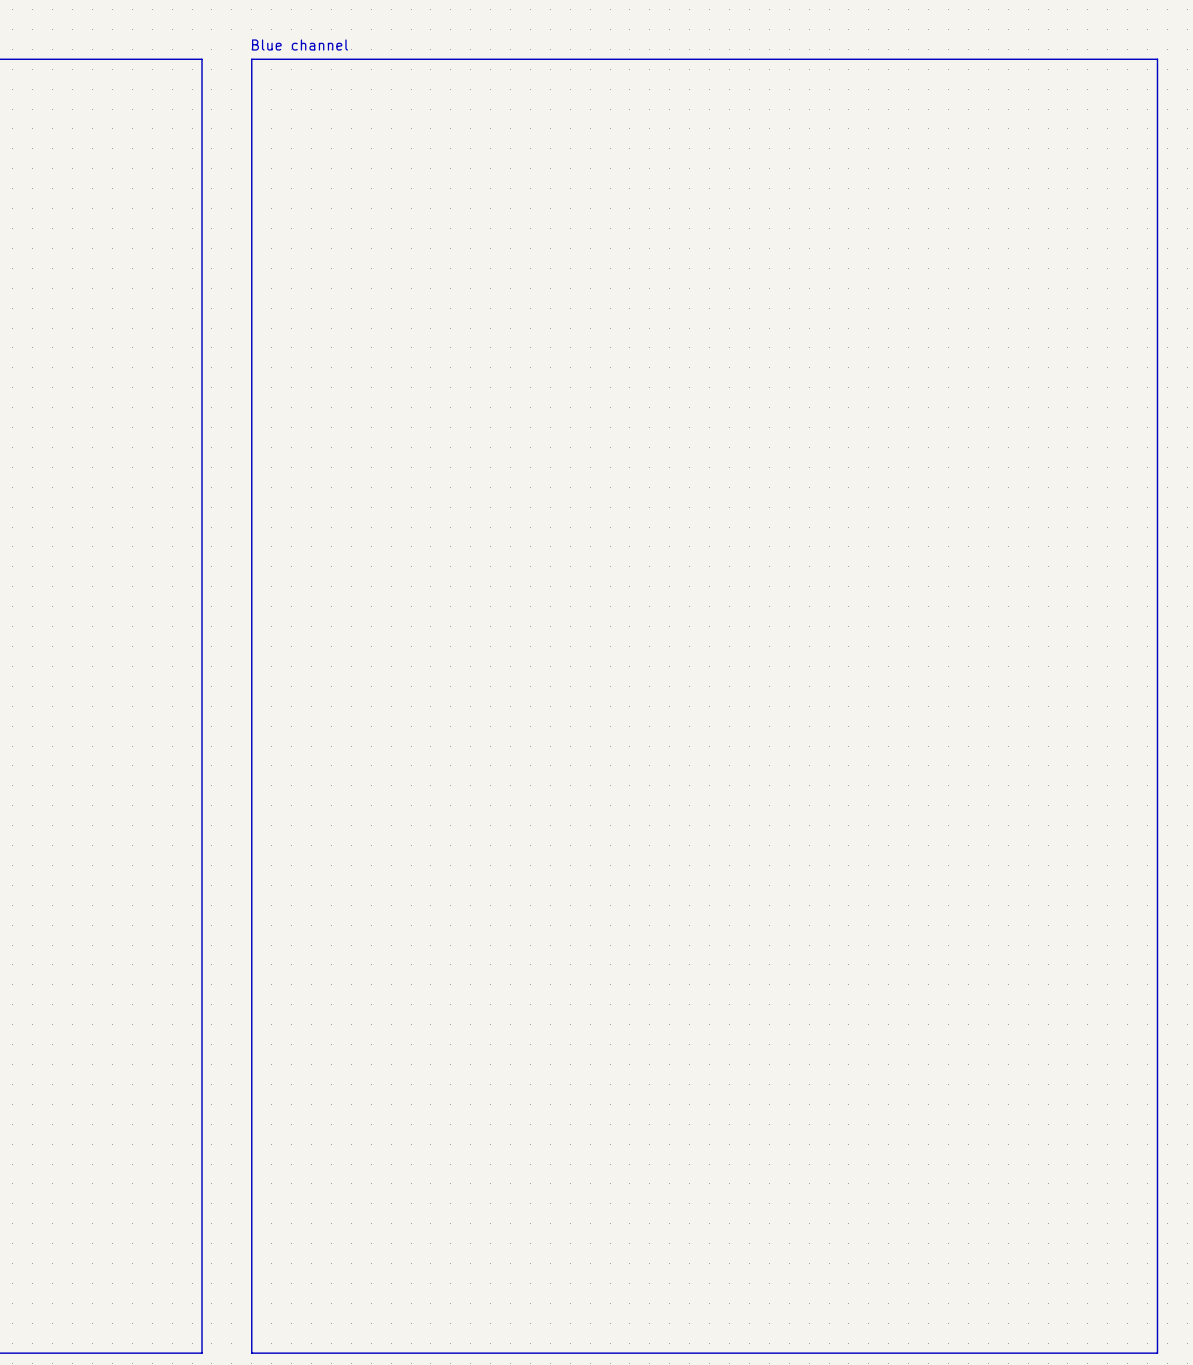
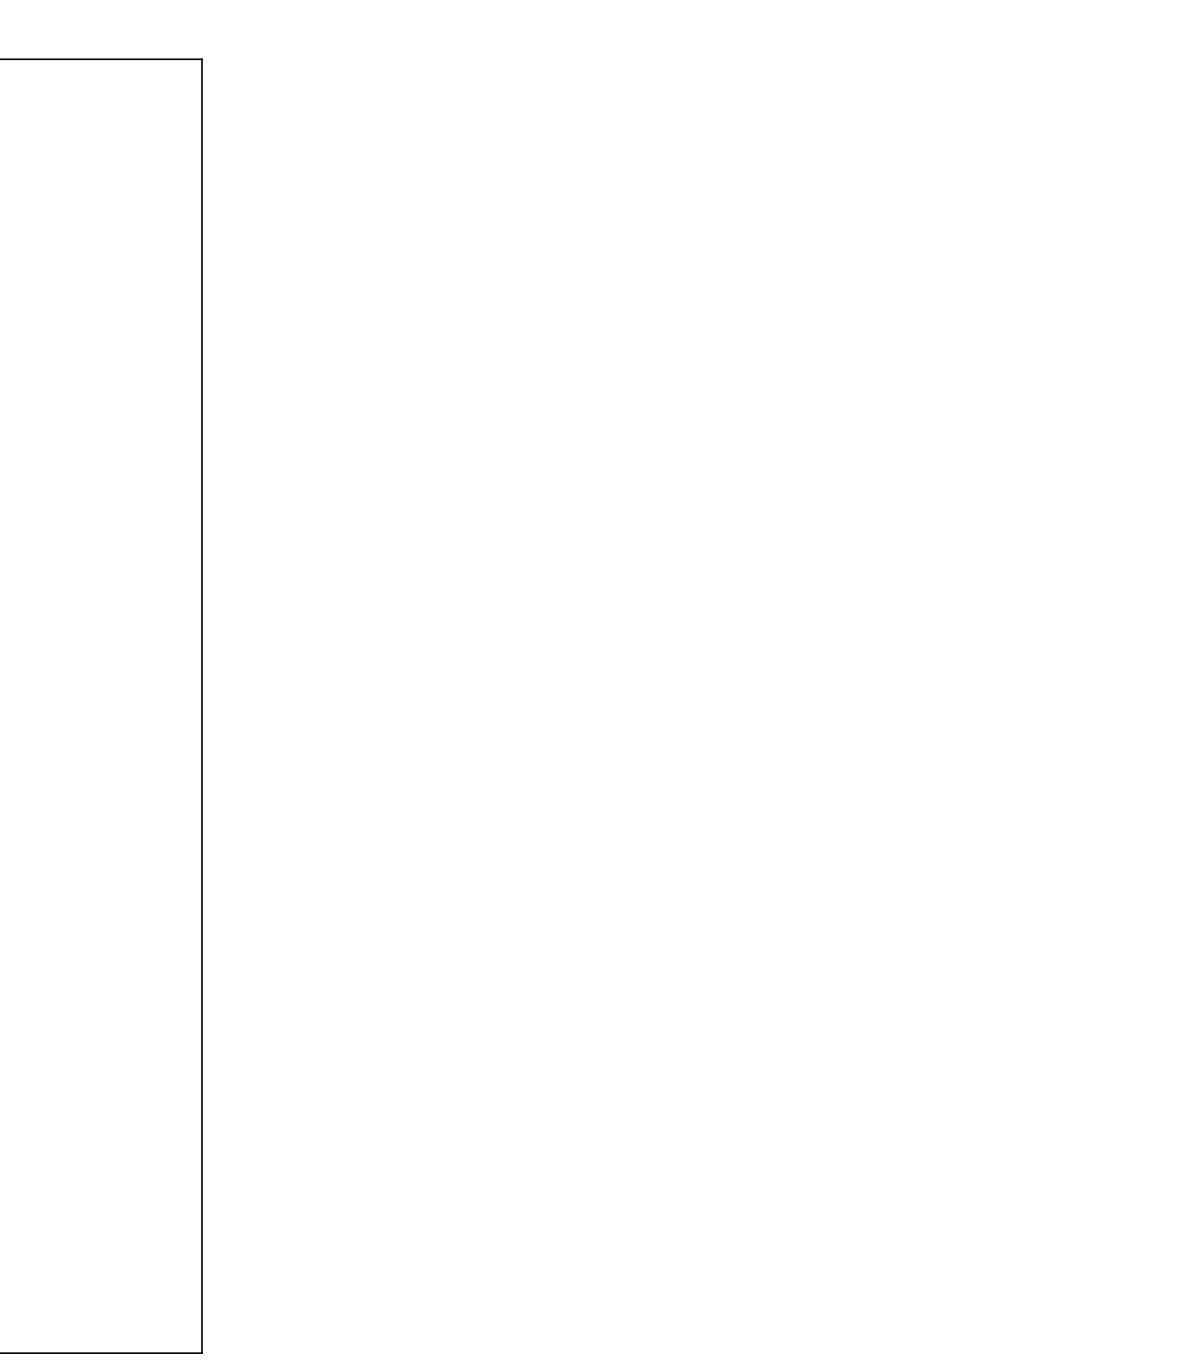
text: Blue channel (300, 44) -> none
line: (251, 59) (1157, 59) (1157, 1353) (251, 1353) (251, 59) -> none

